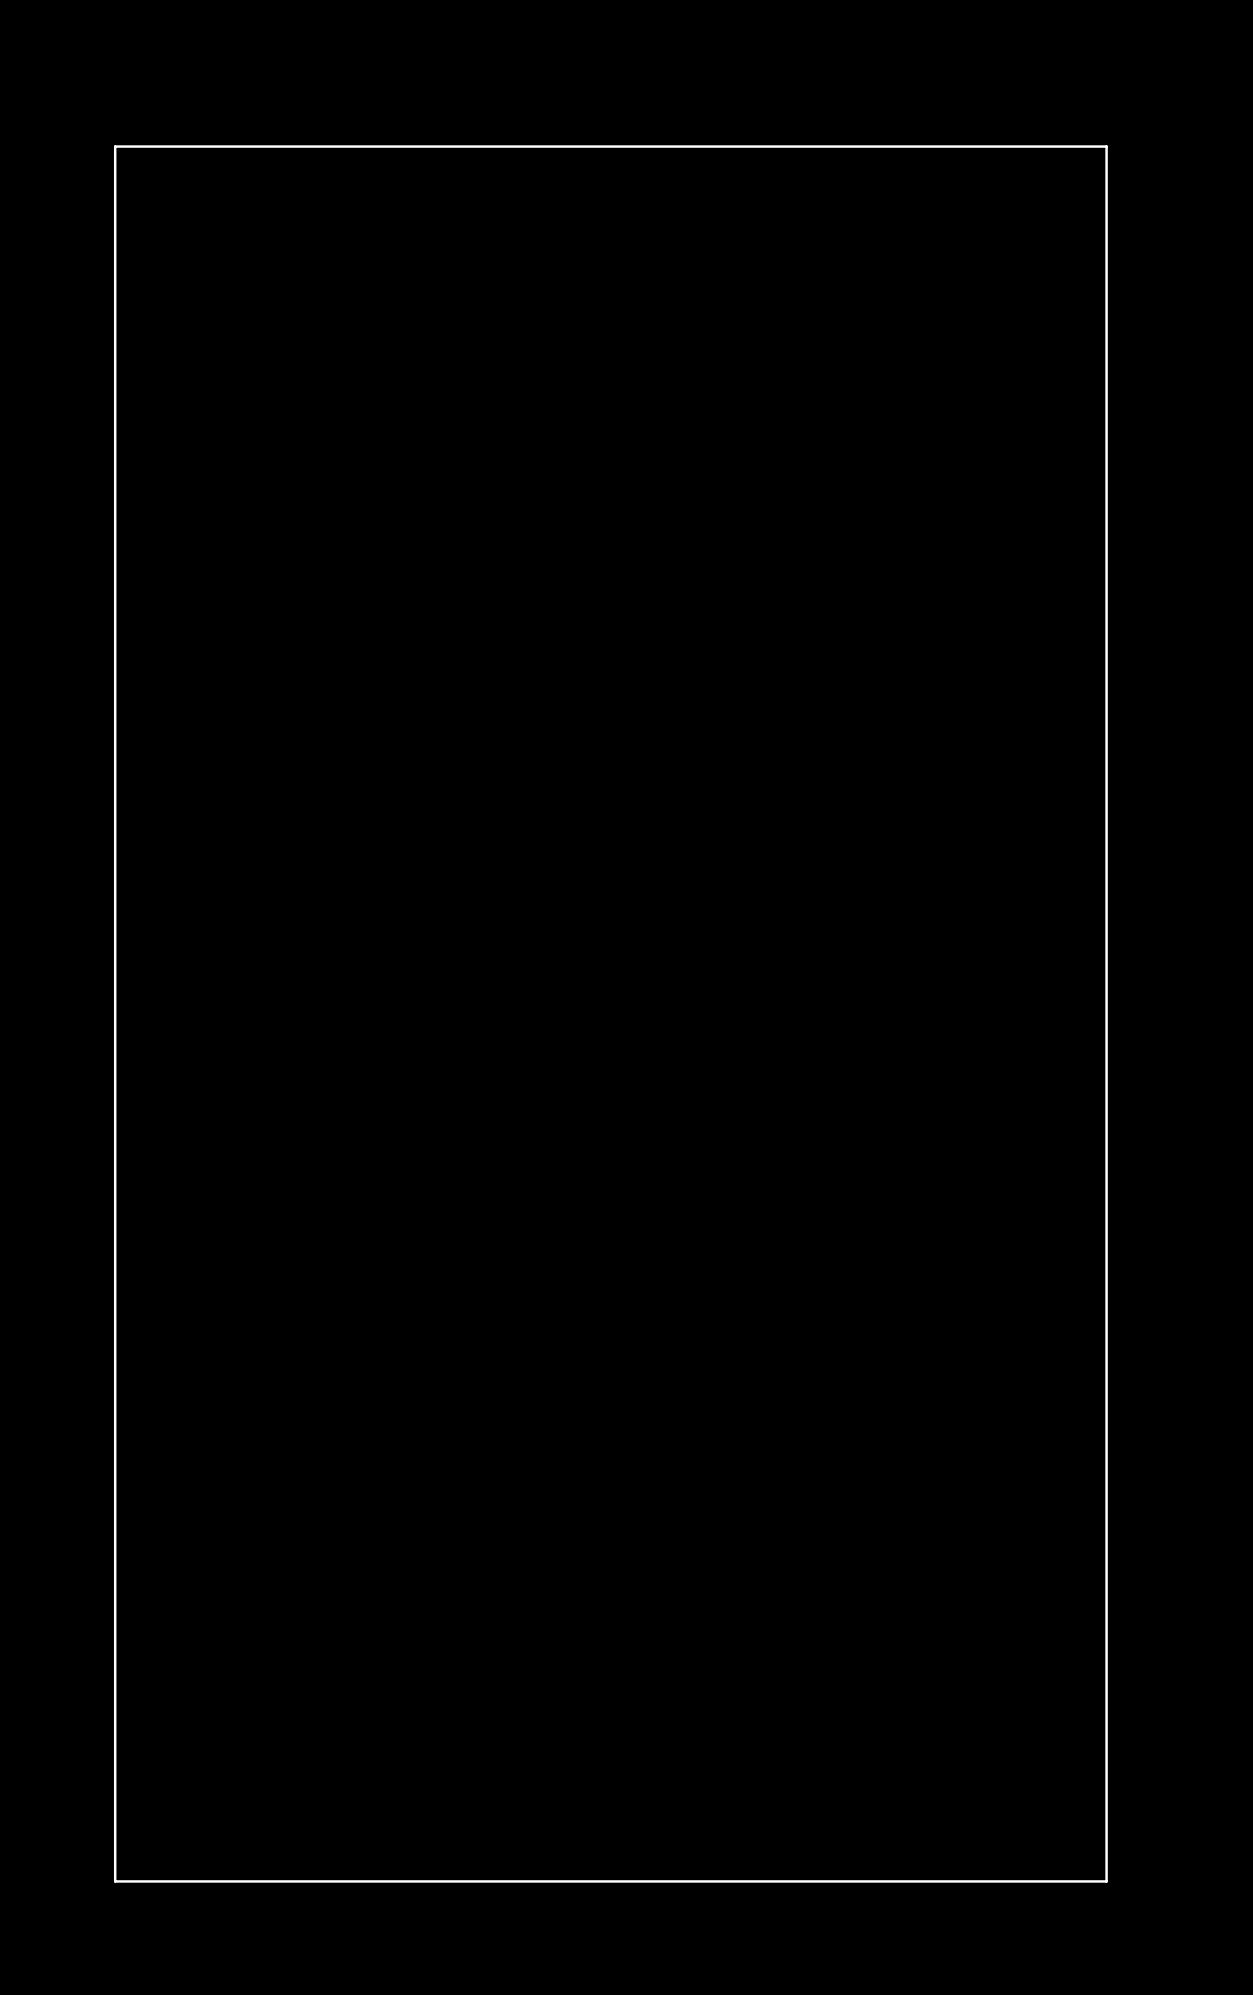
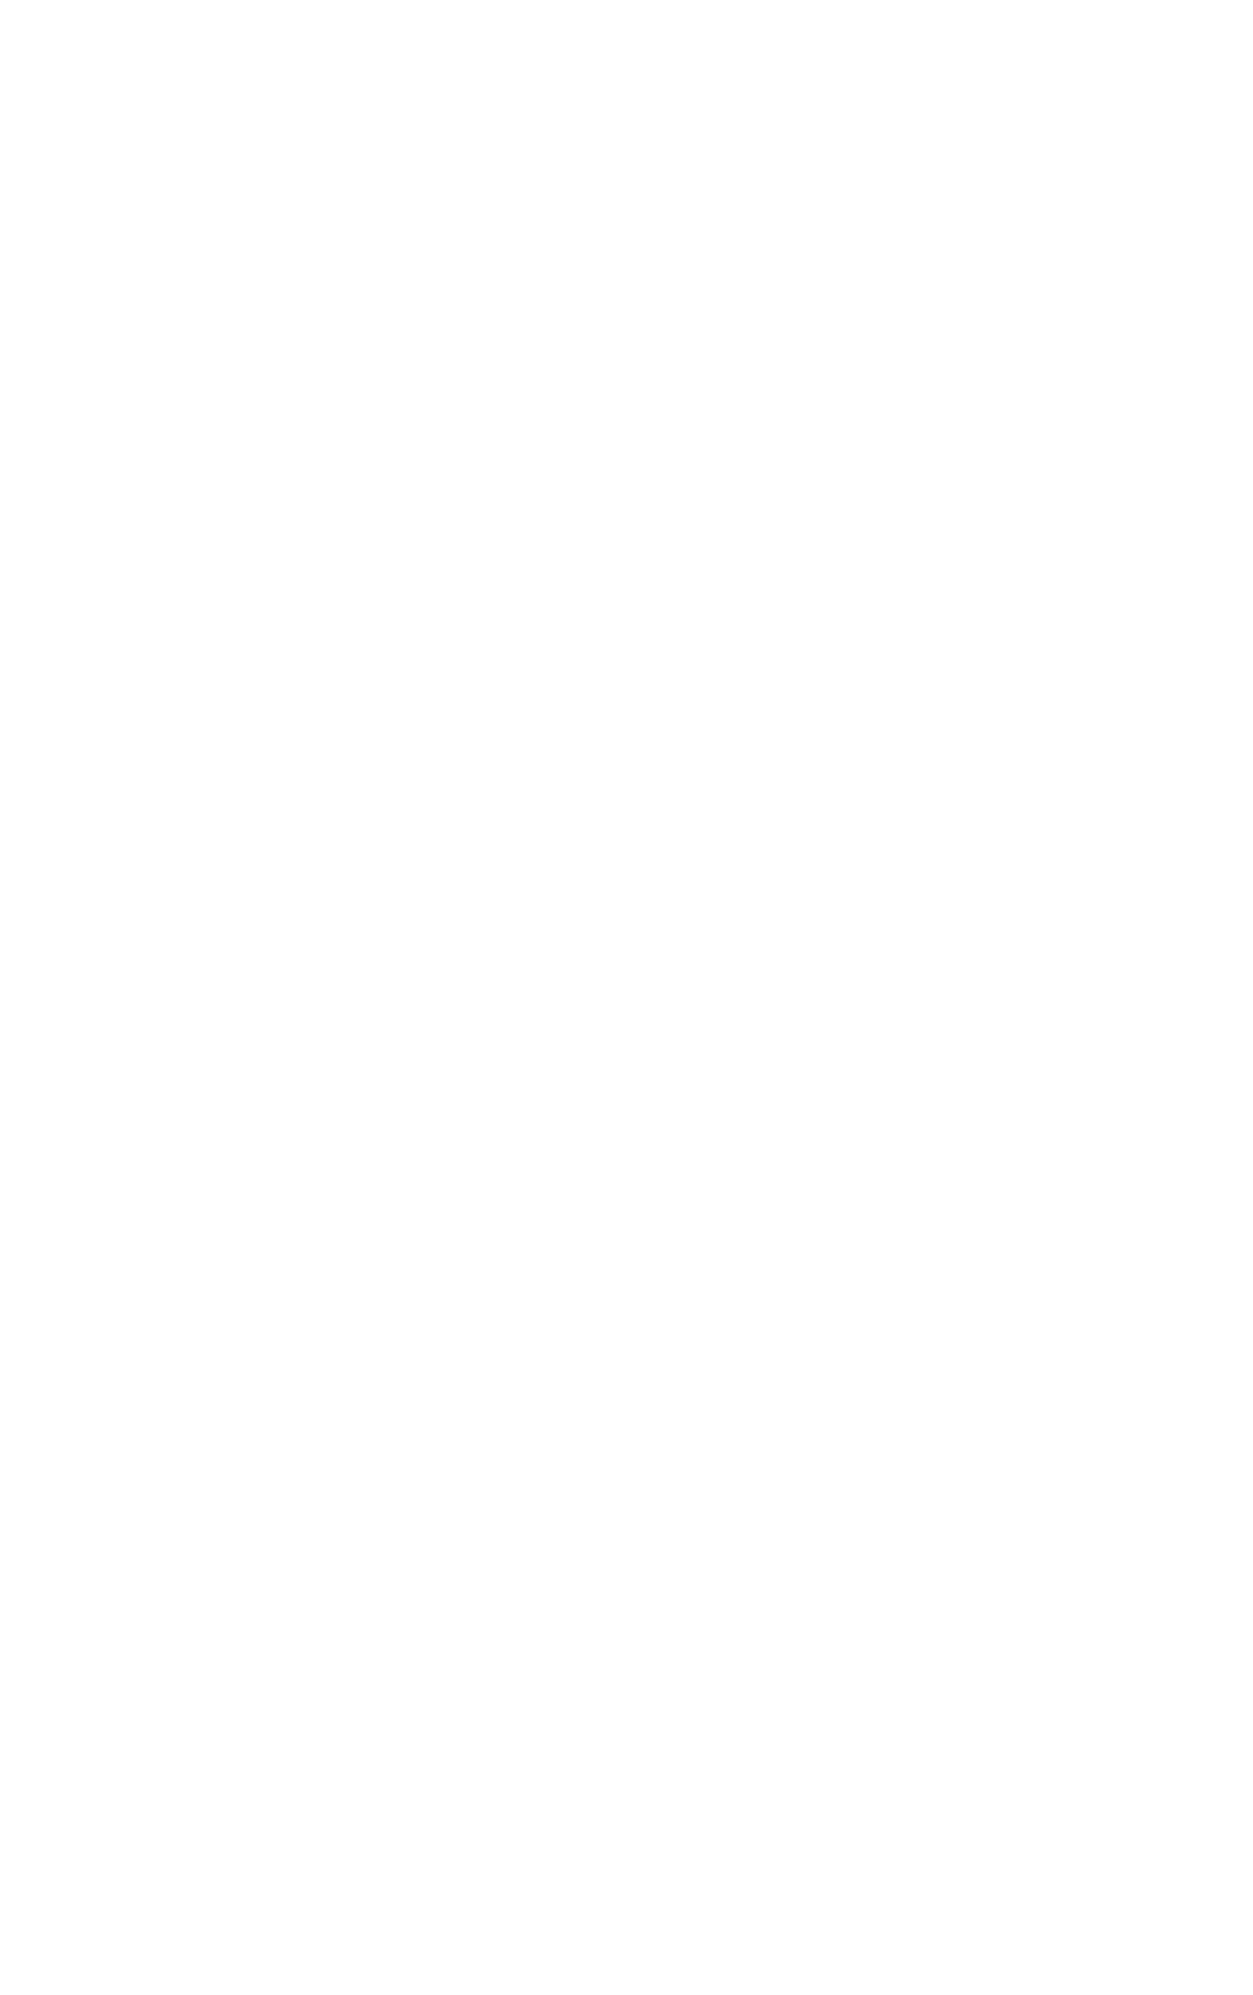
board edge: (1106, 146) (115, 146) (115, 1881) (1106, 1881) (1106, 146) -> none

